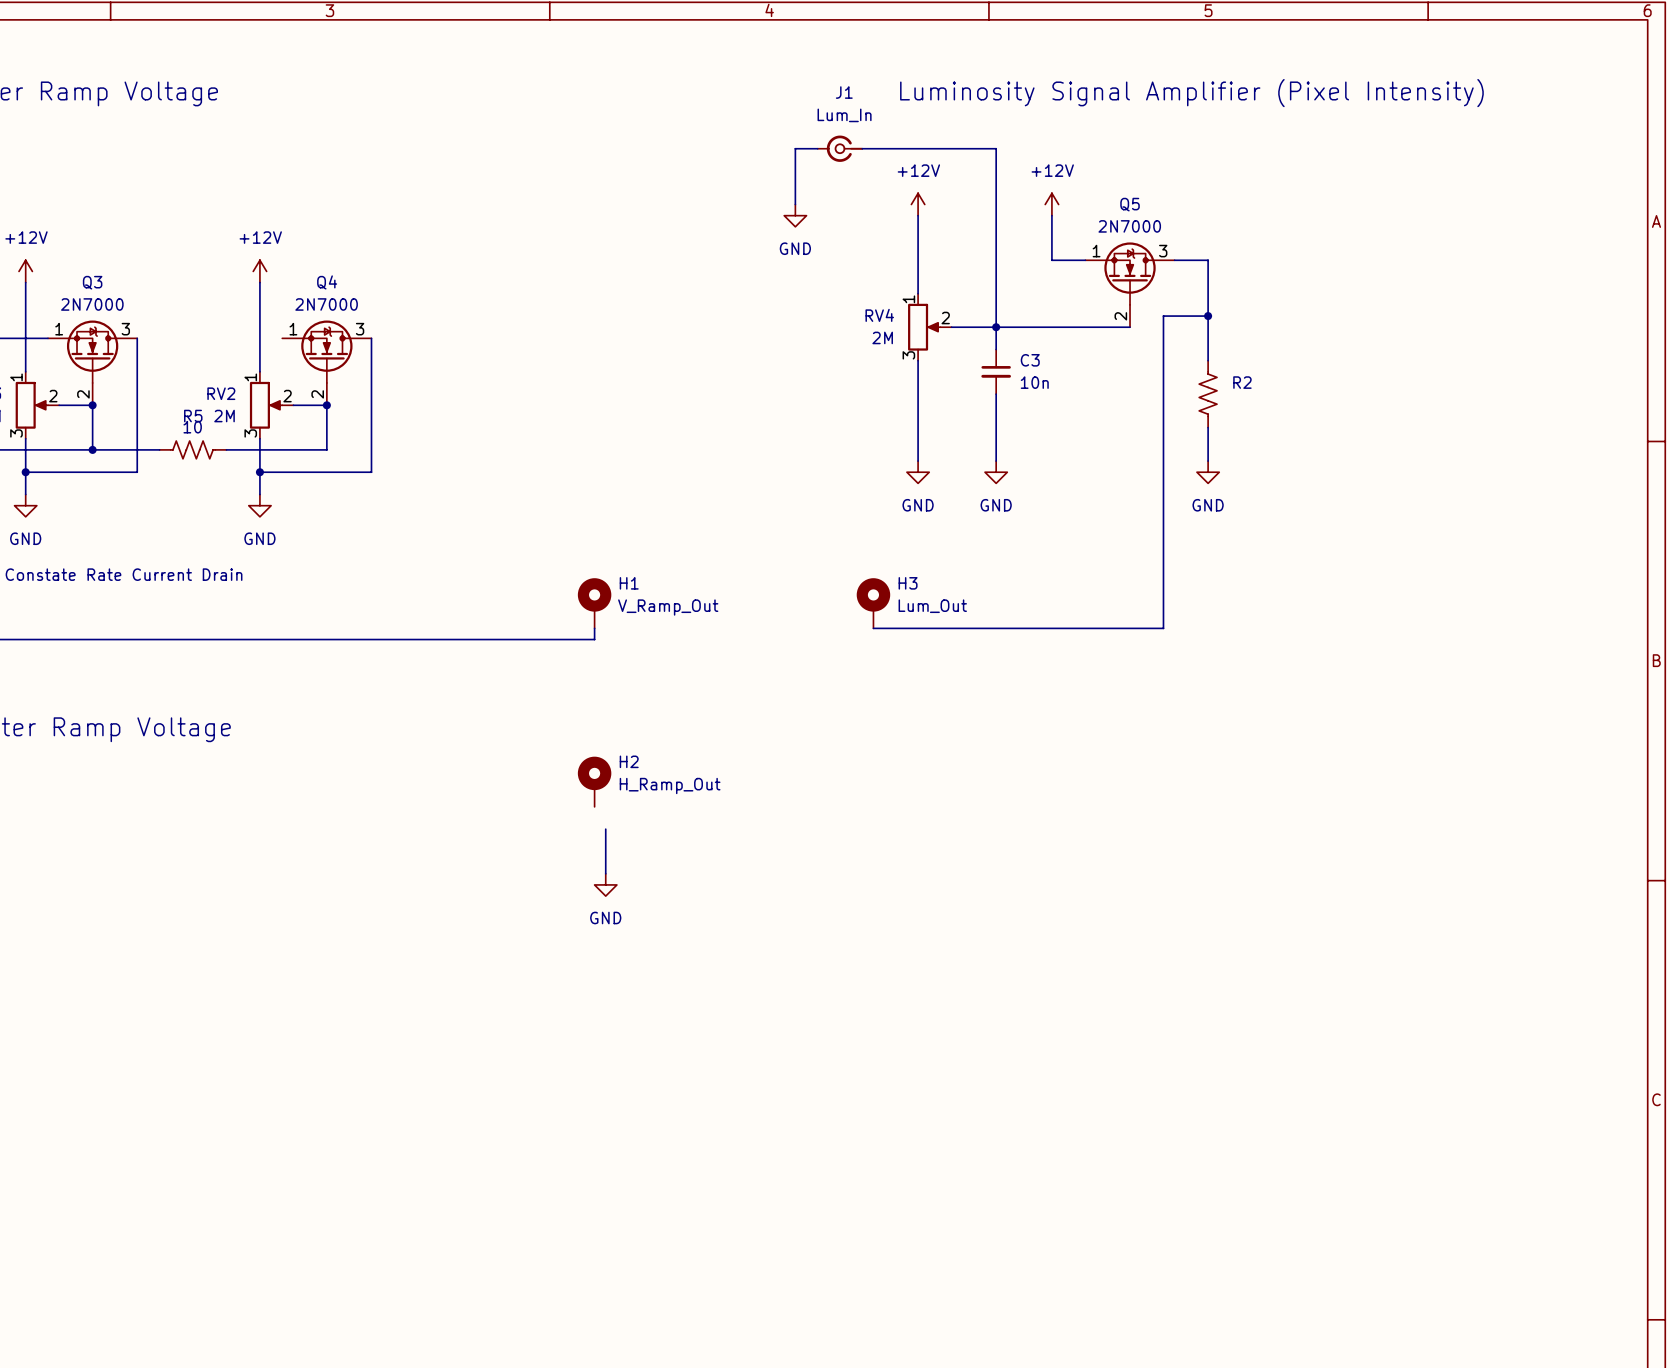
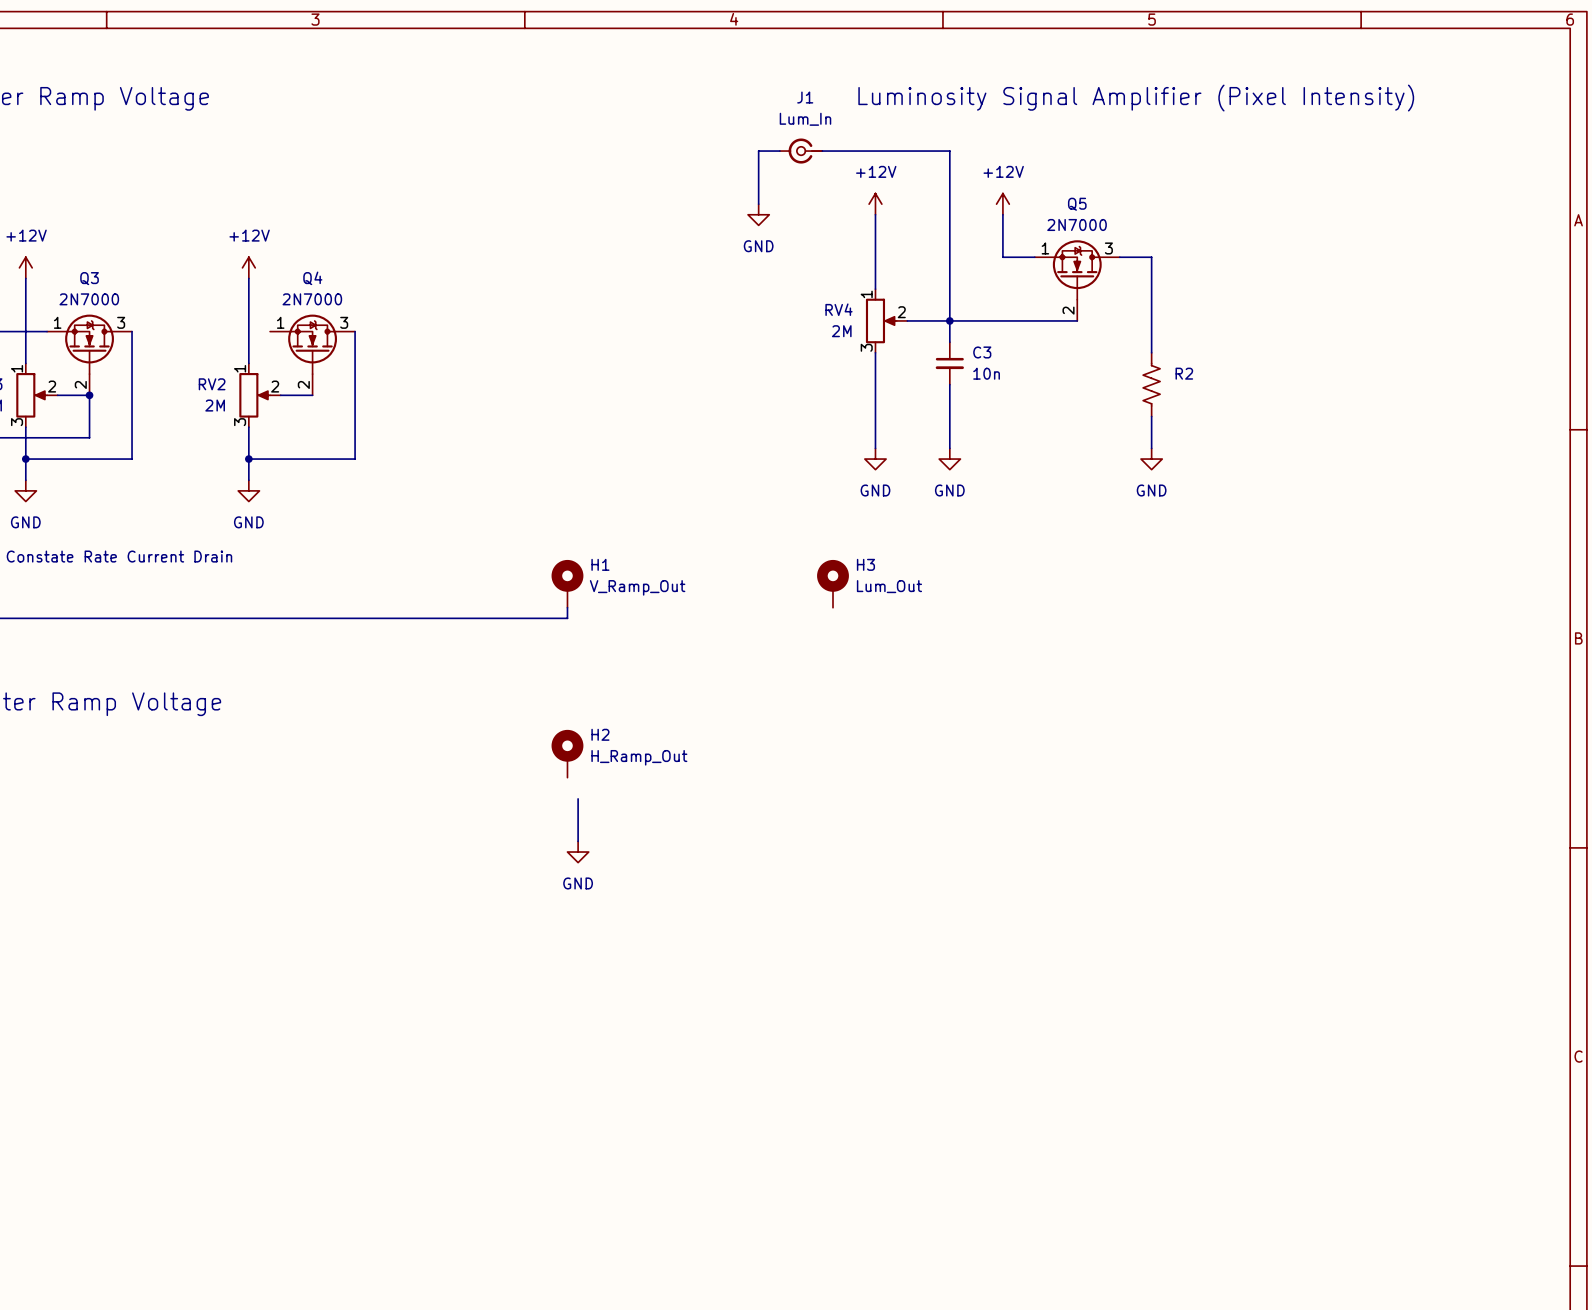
wire: (1208, 316) (1163, 316) (1163, 628) (873, 628) -> none
junction: (1208, 316) -> none
wire: (326, 405) (326, 449) (226, 449) -> none
junction: (326, 405) -> none
wire: (92, 449) (159, 449) -> none
junction: (92, 449) -> none
R5: 10 (193, 449) -> none

